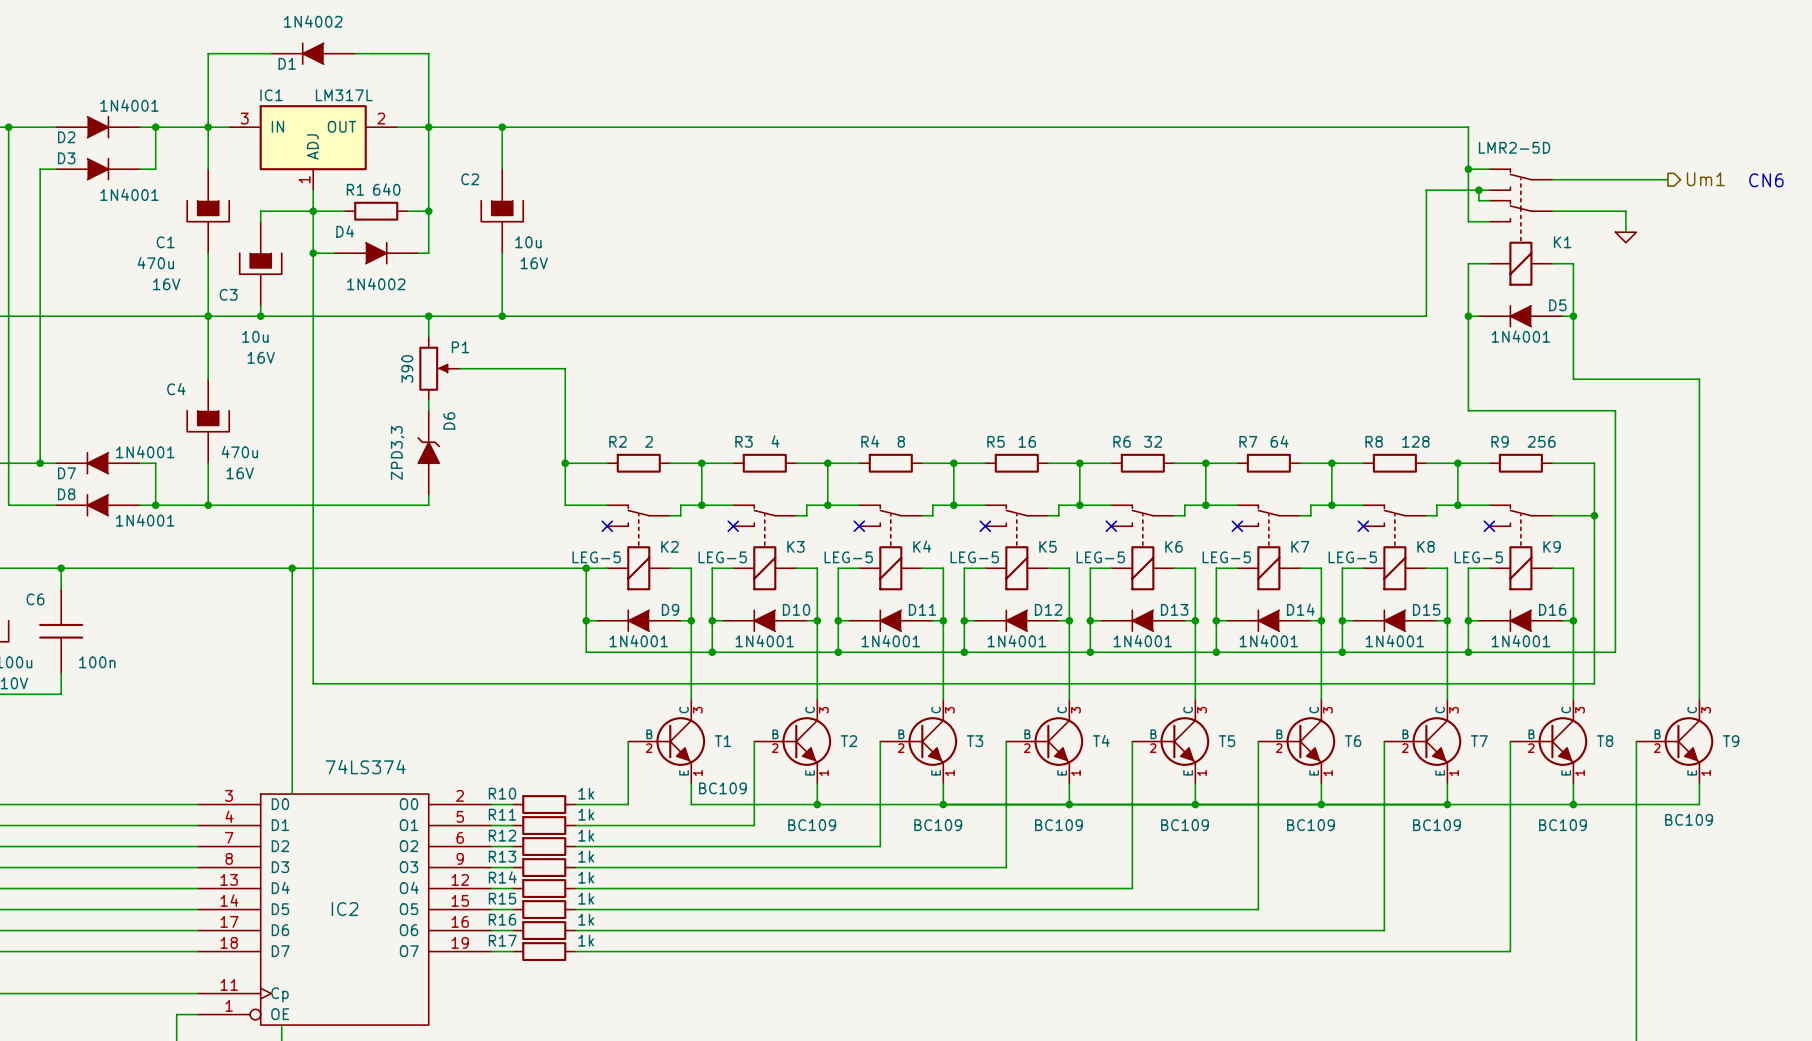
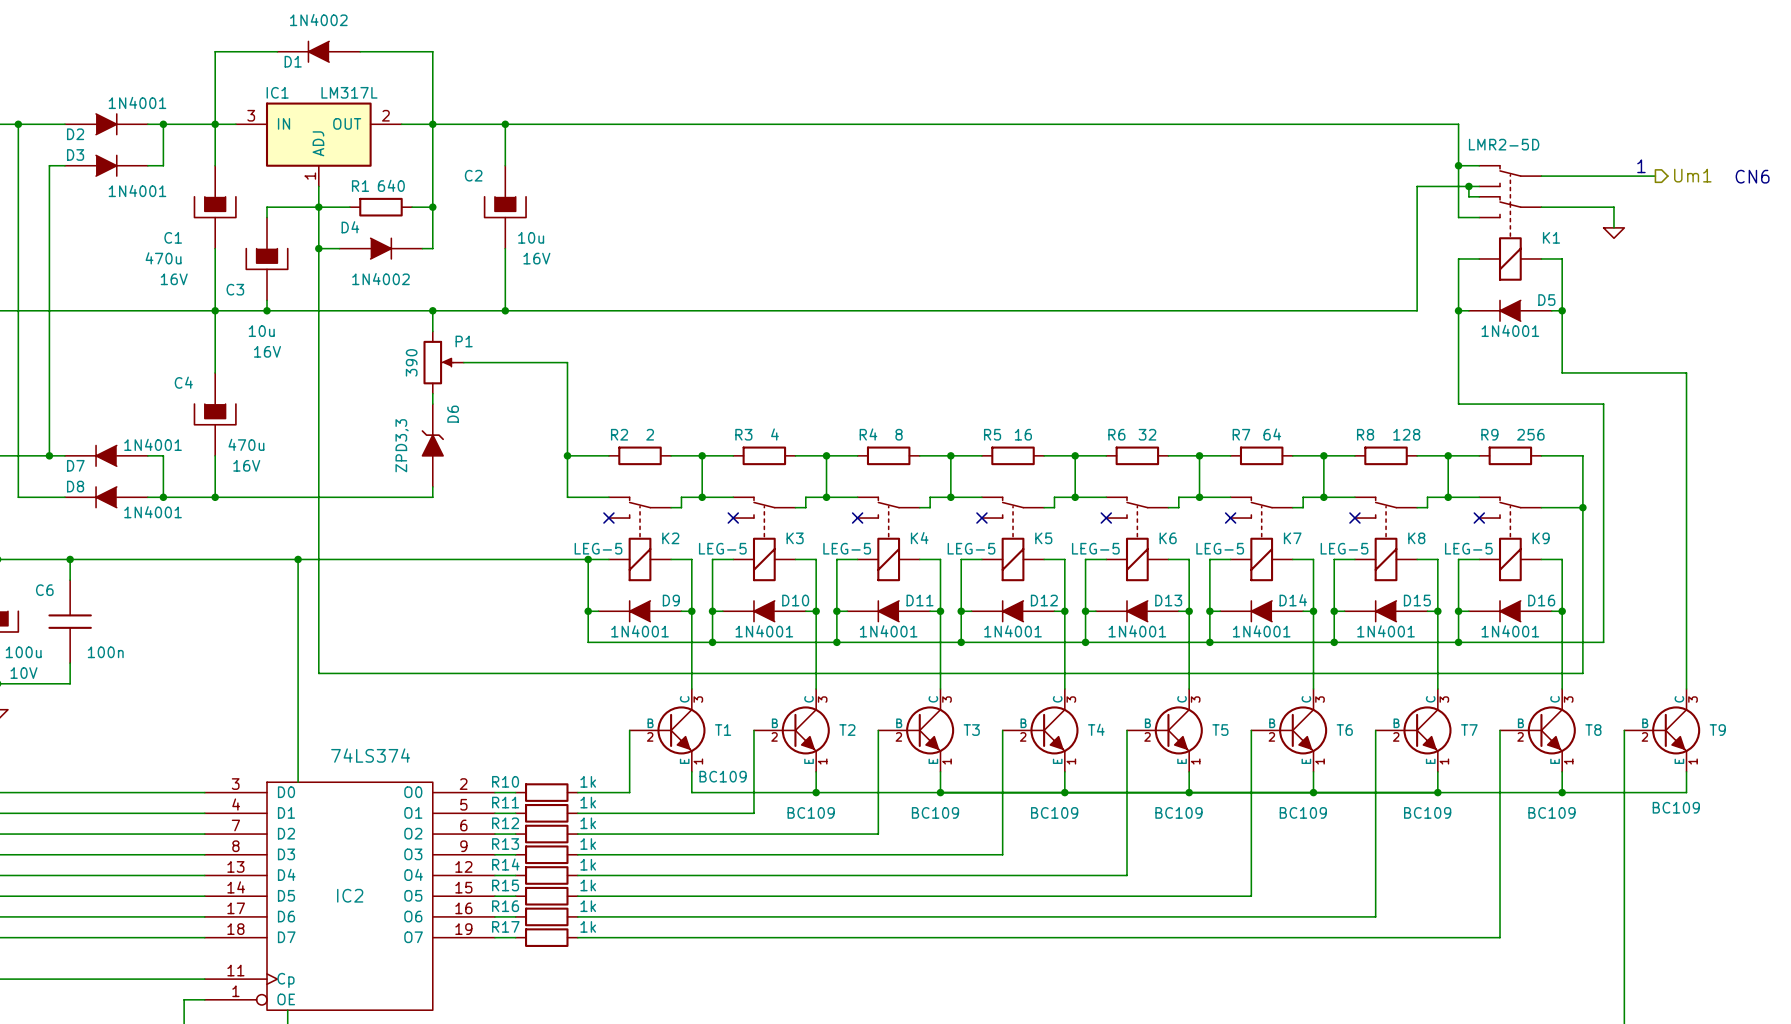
text: none -> 1 (1641, 166)

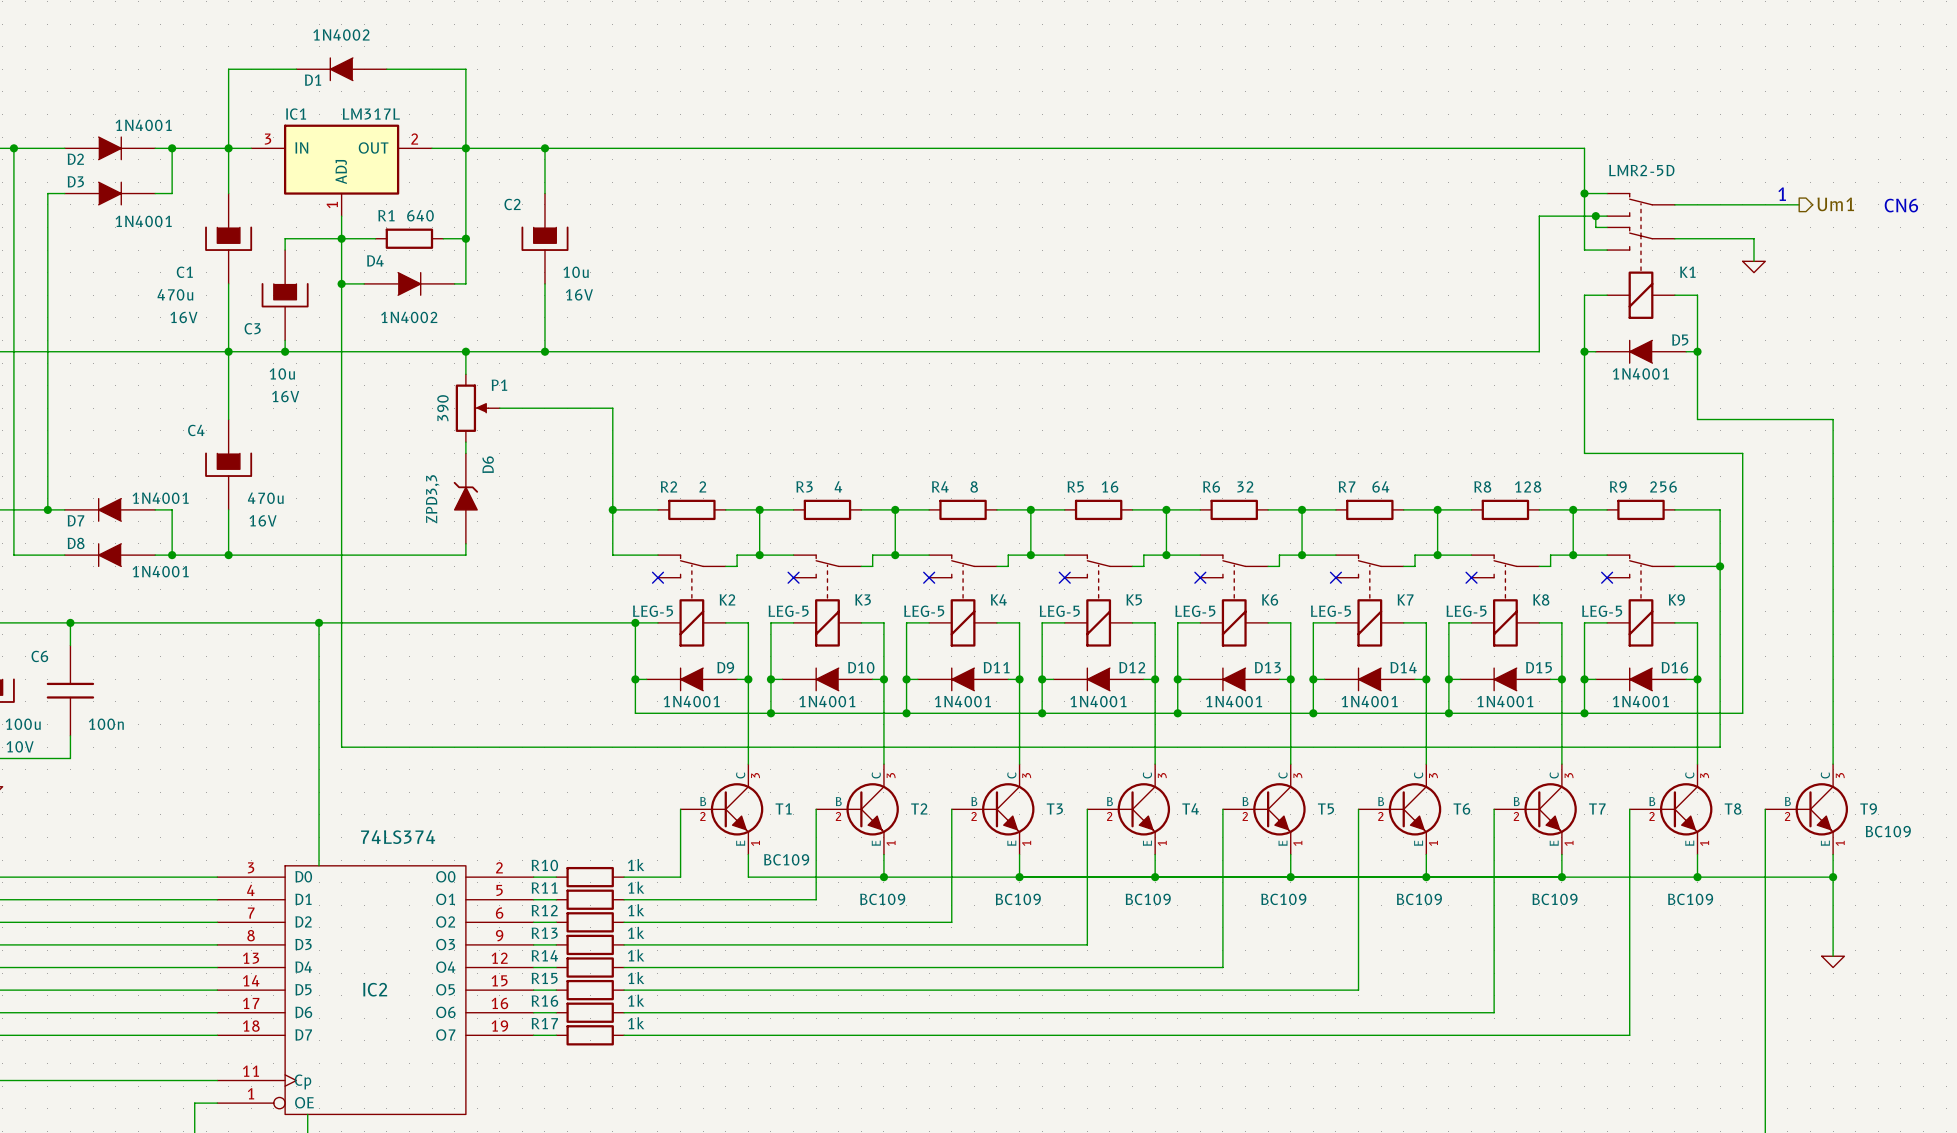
wire: none -> (1833, 877) (1833, 956)
junction: none -> (1833, 877)
T9 value position: BC109 (1676, 807) -> BC109 (1888, 831)
power symbol: none -> (1833, 961)

